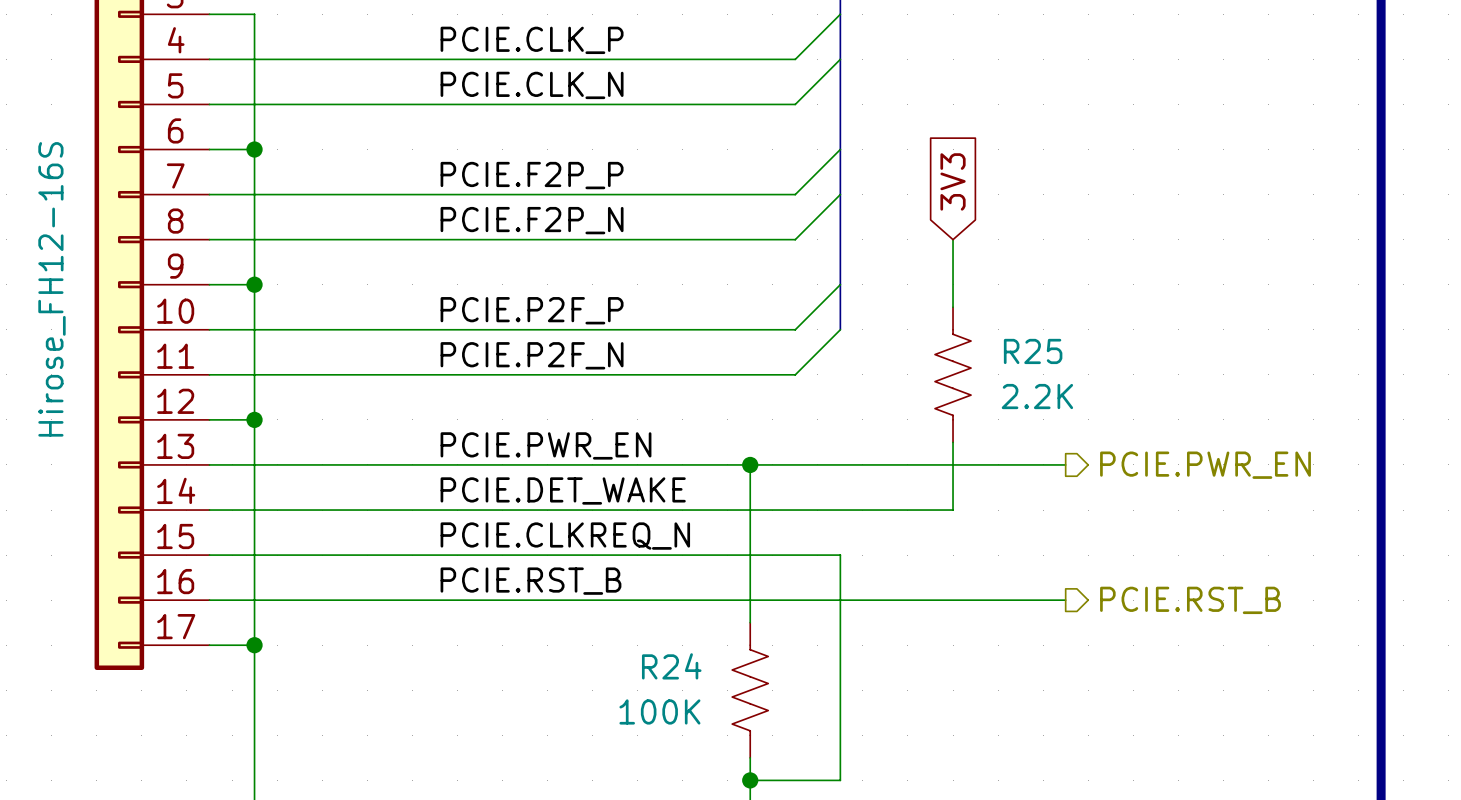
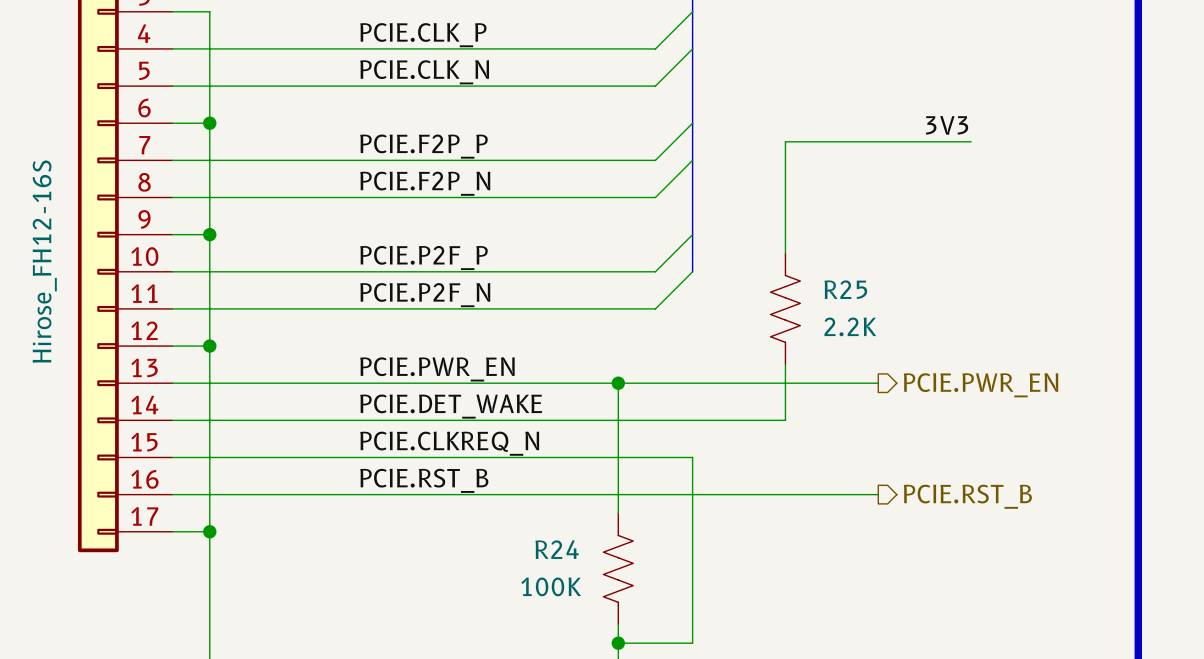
label: none -> 3V3 (947, 125)
wire: none -> (971, 141) (785, 141) (785, 197)
global label: 3V3 (953, 181) -> none

